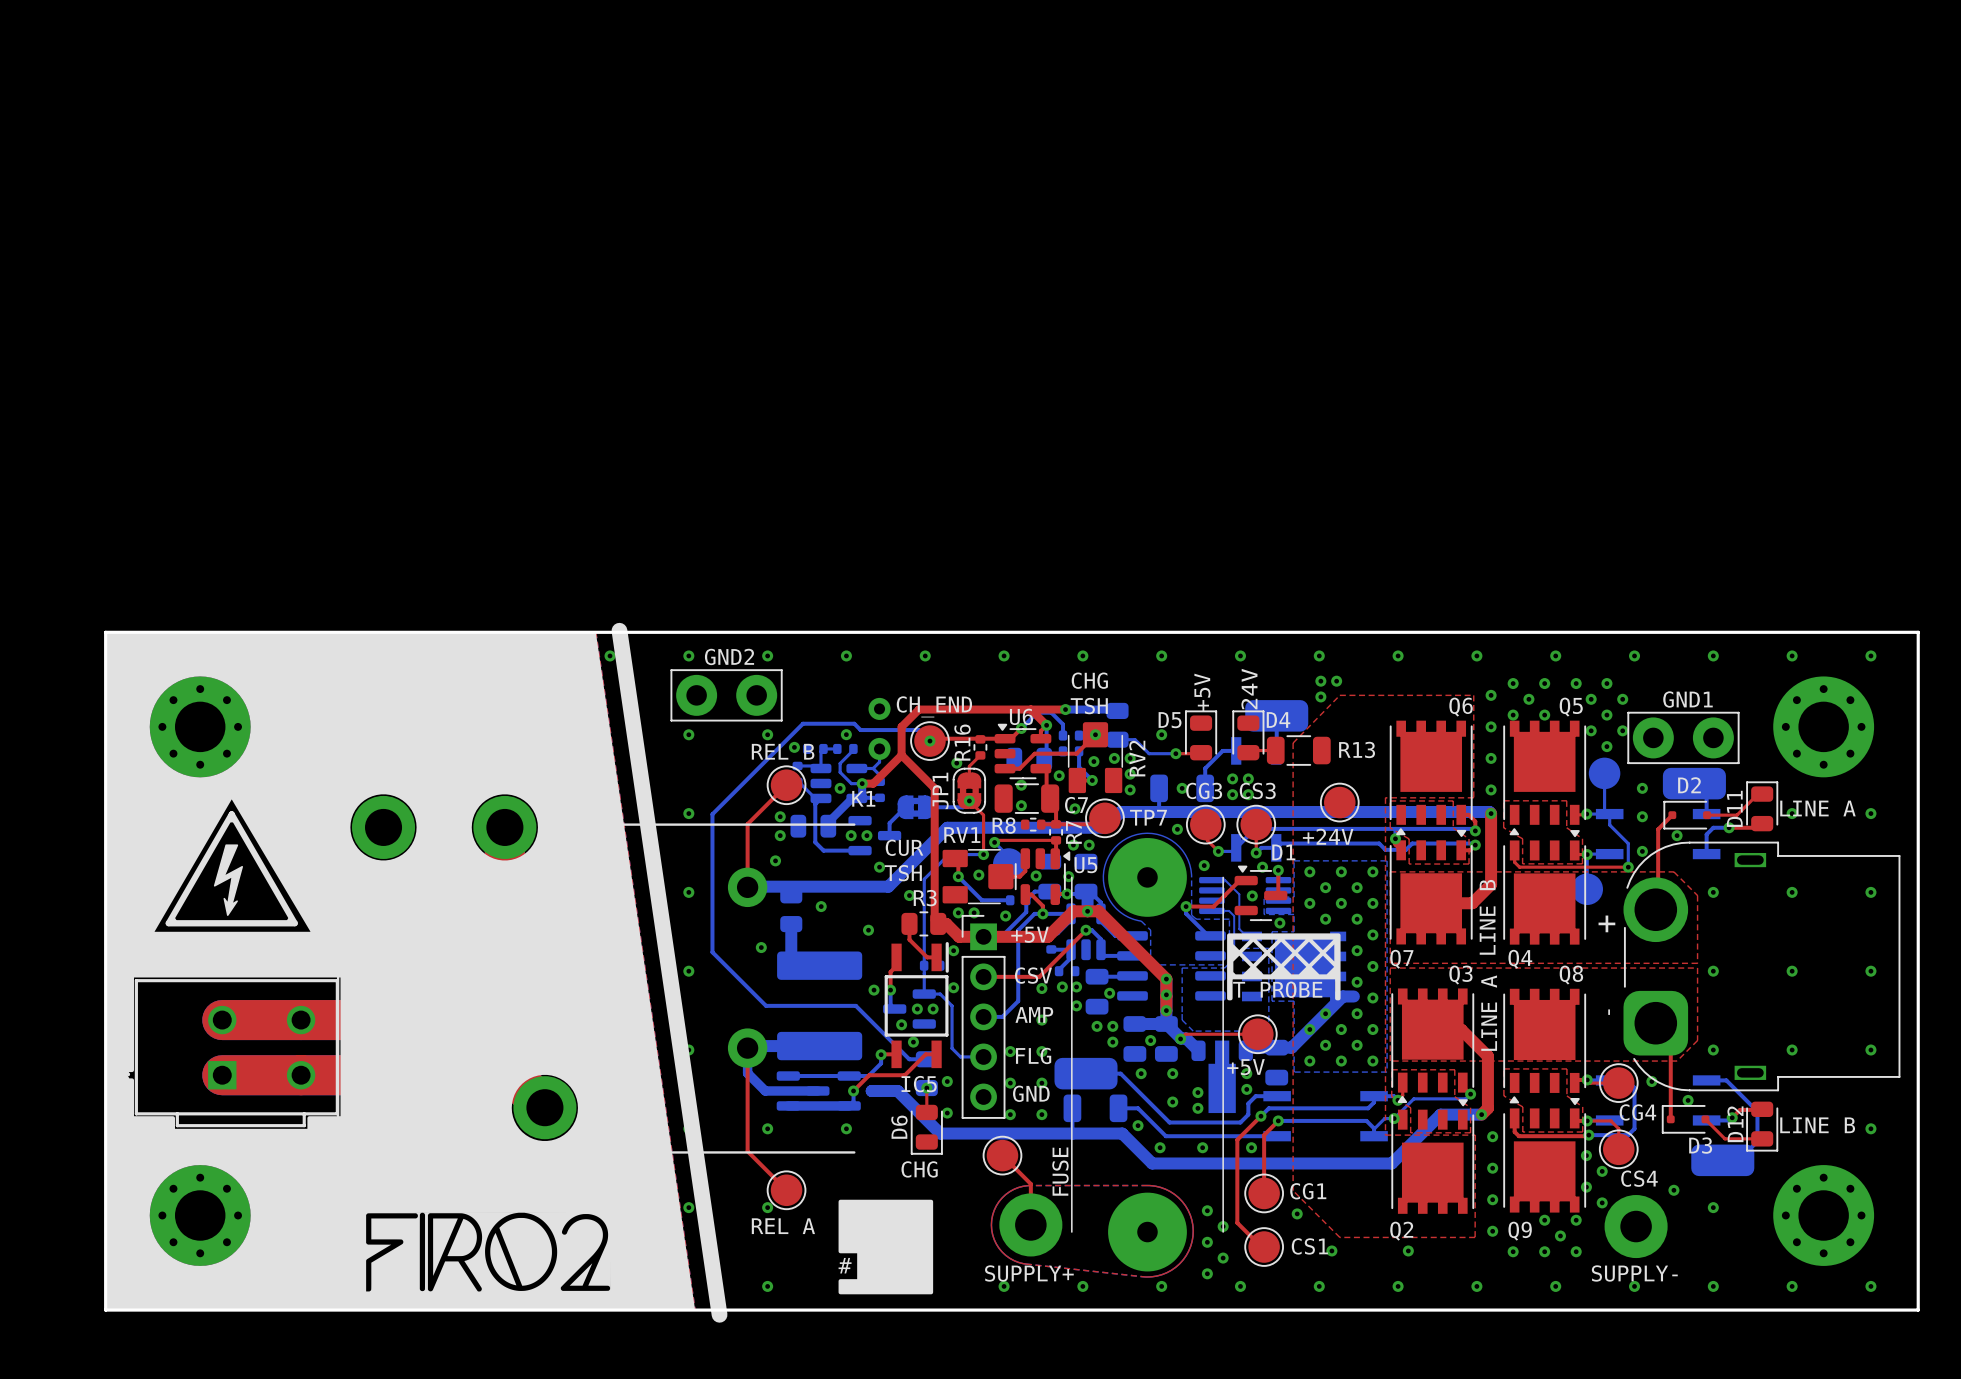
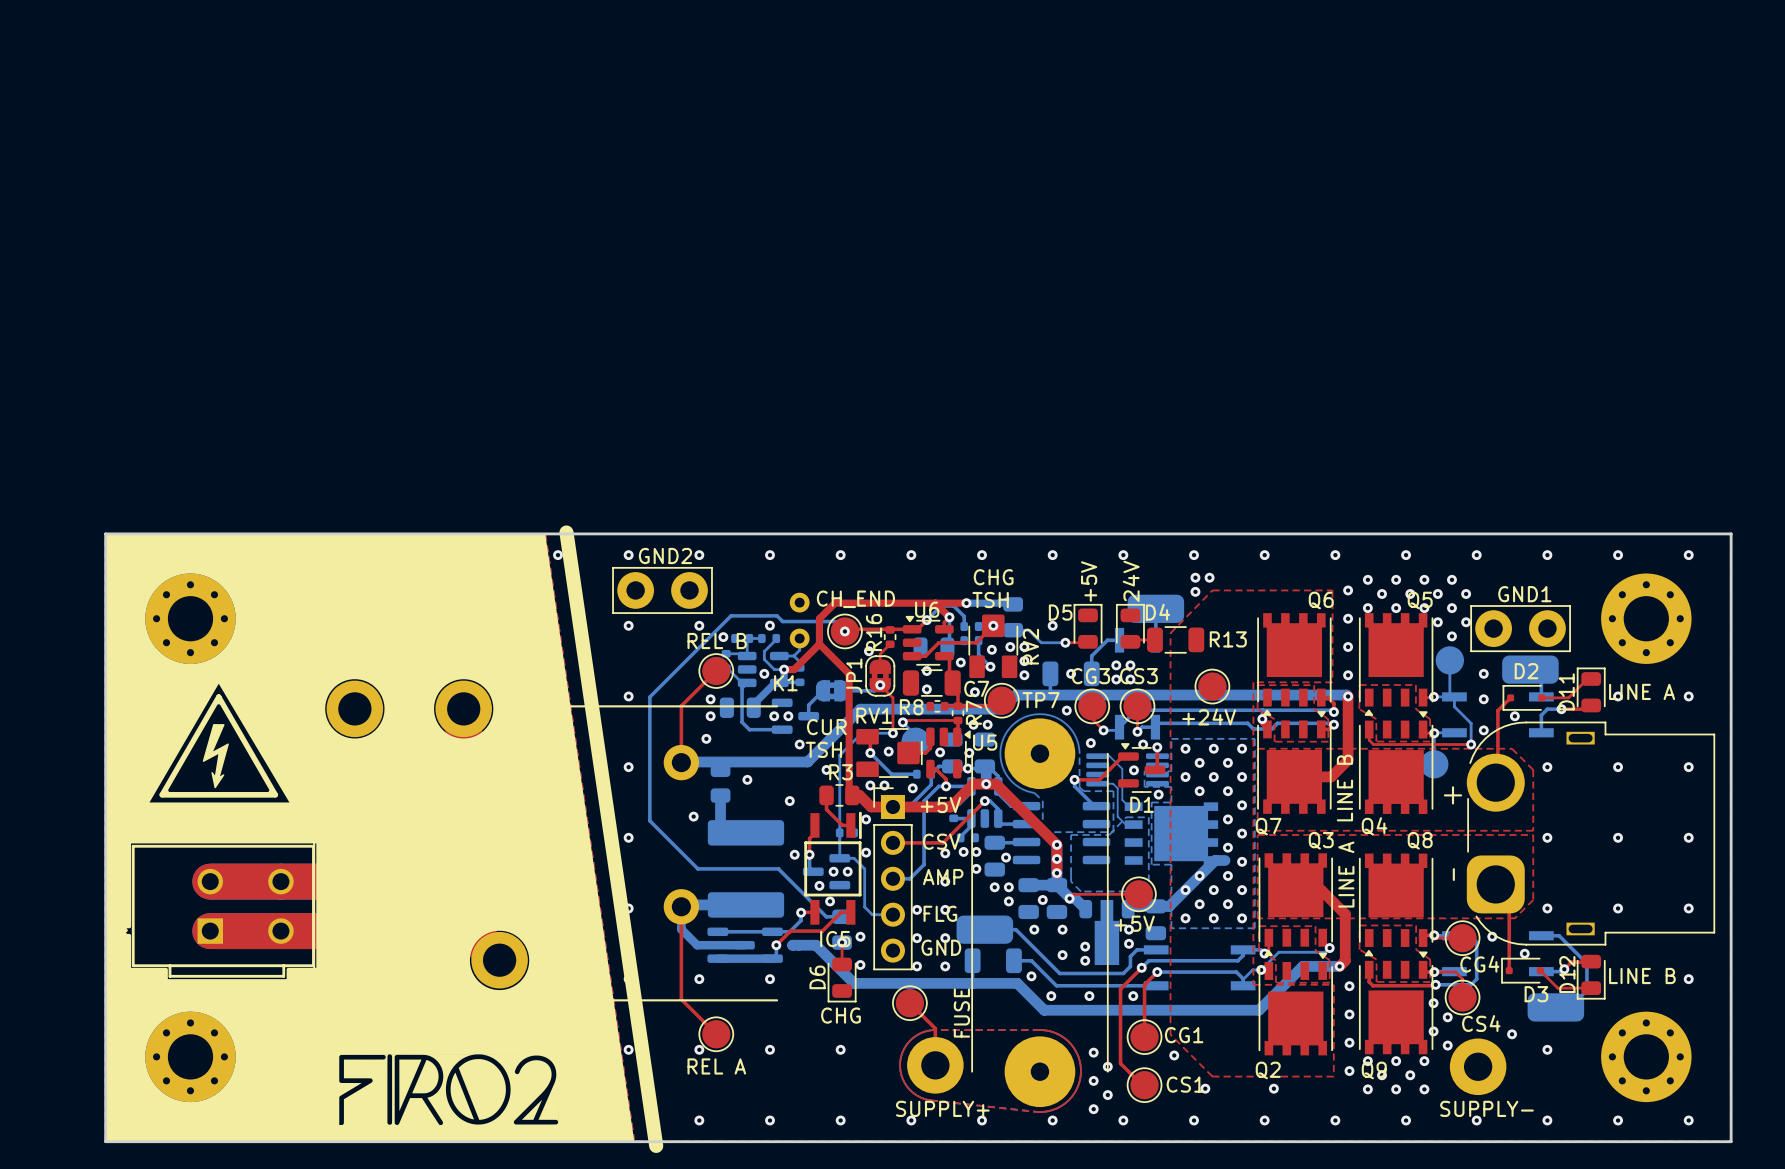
via: none -> (1410, 593)
via: none -> (1424, 608)
D1 name position: D1 (1283, 852) -> D1 (1142, 804)
drawing: [1227, 933, 1341, 1001] -> none
text: T PROBE (1277, 989) -> none
drawing: [838, 1199, 934, 1295] -> none
via: none -> (1367, 1061)
via: none -> (1382, 1075)
text: # (845, 1265) -> none

